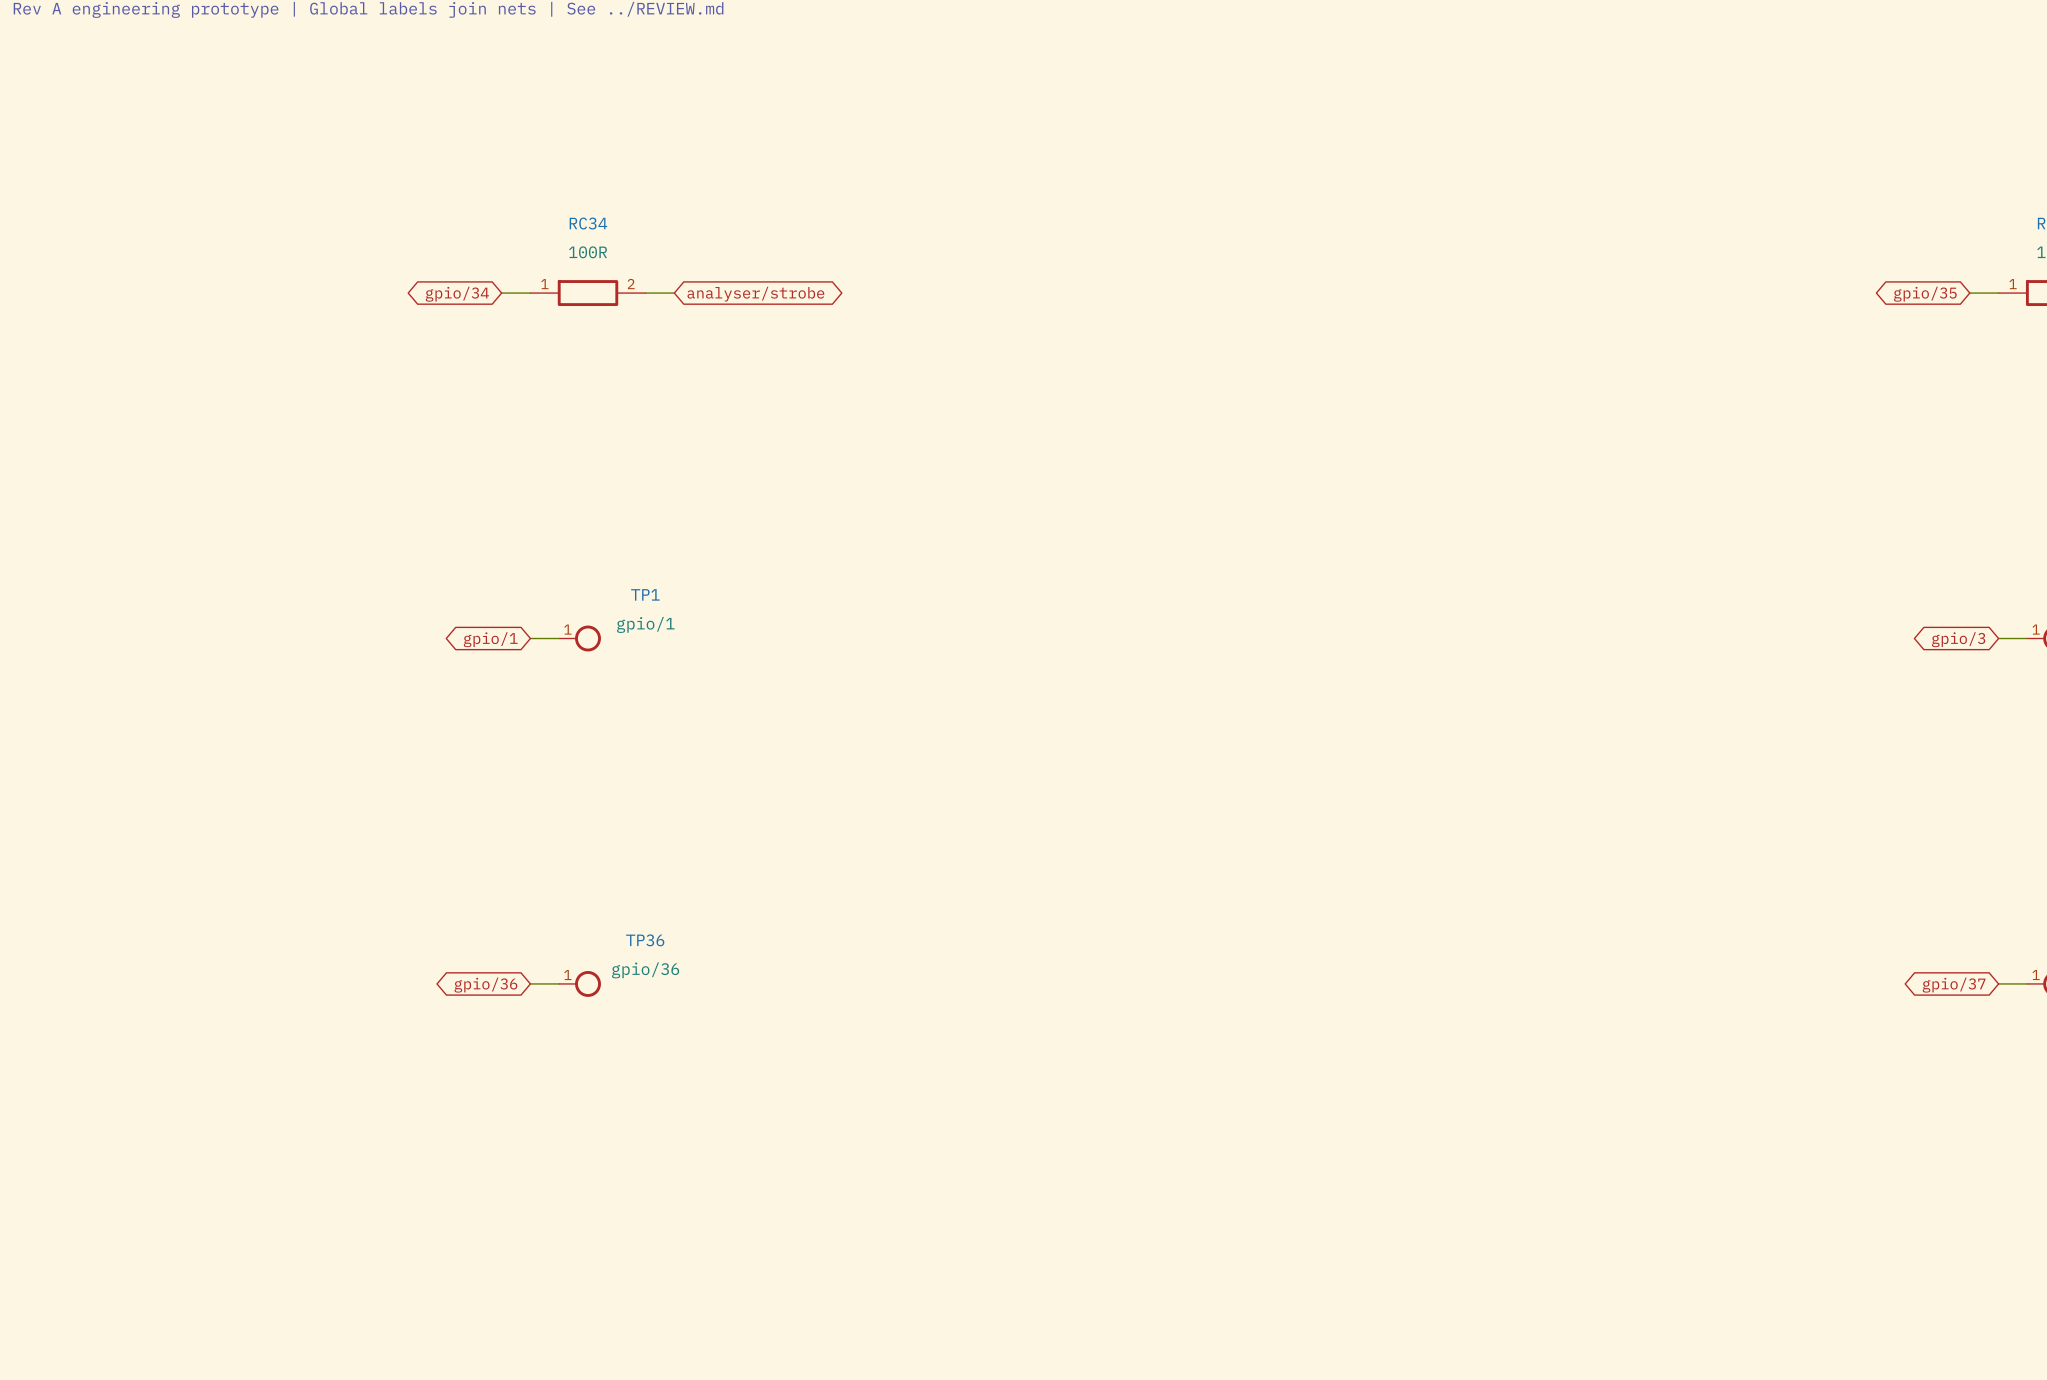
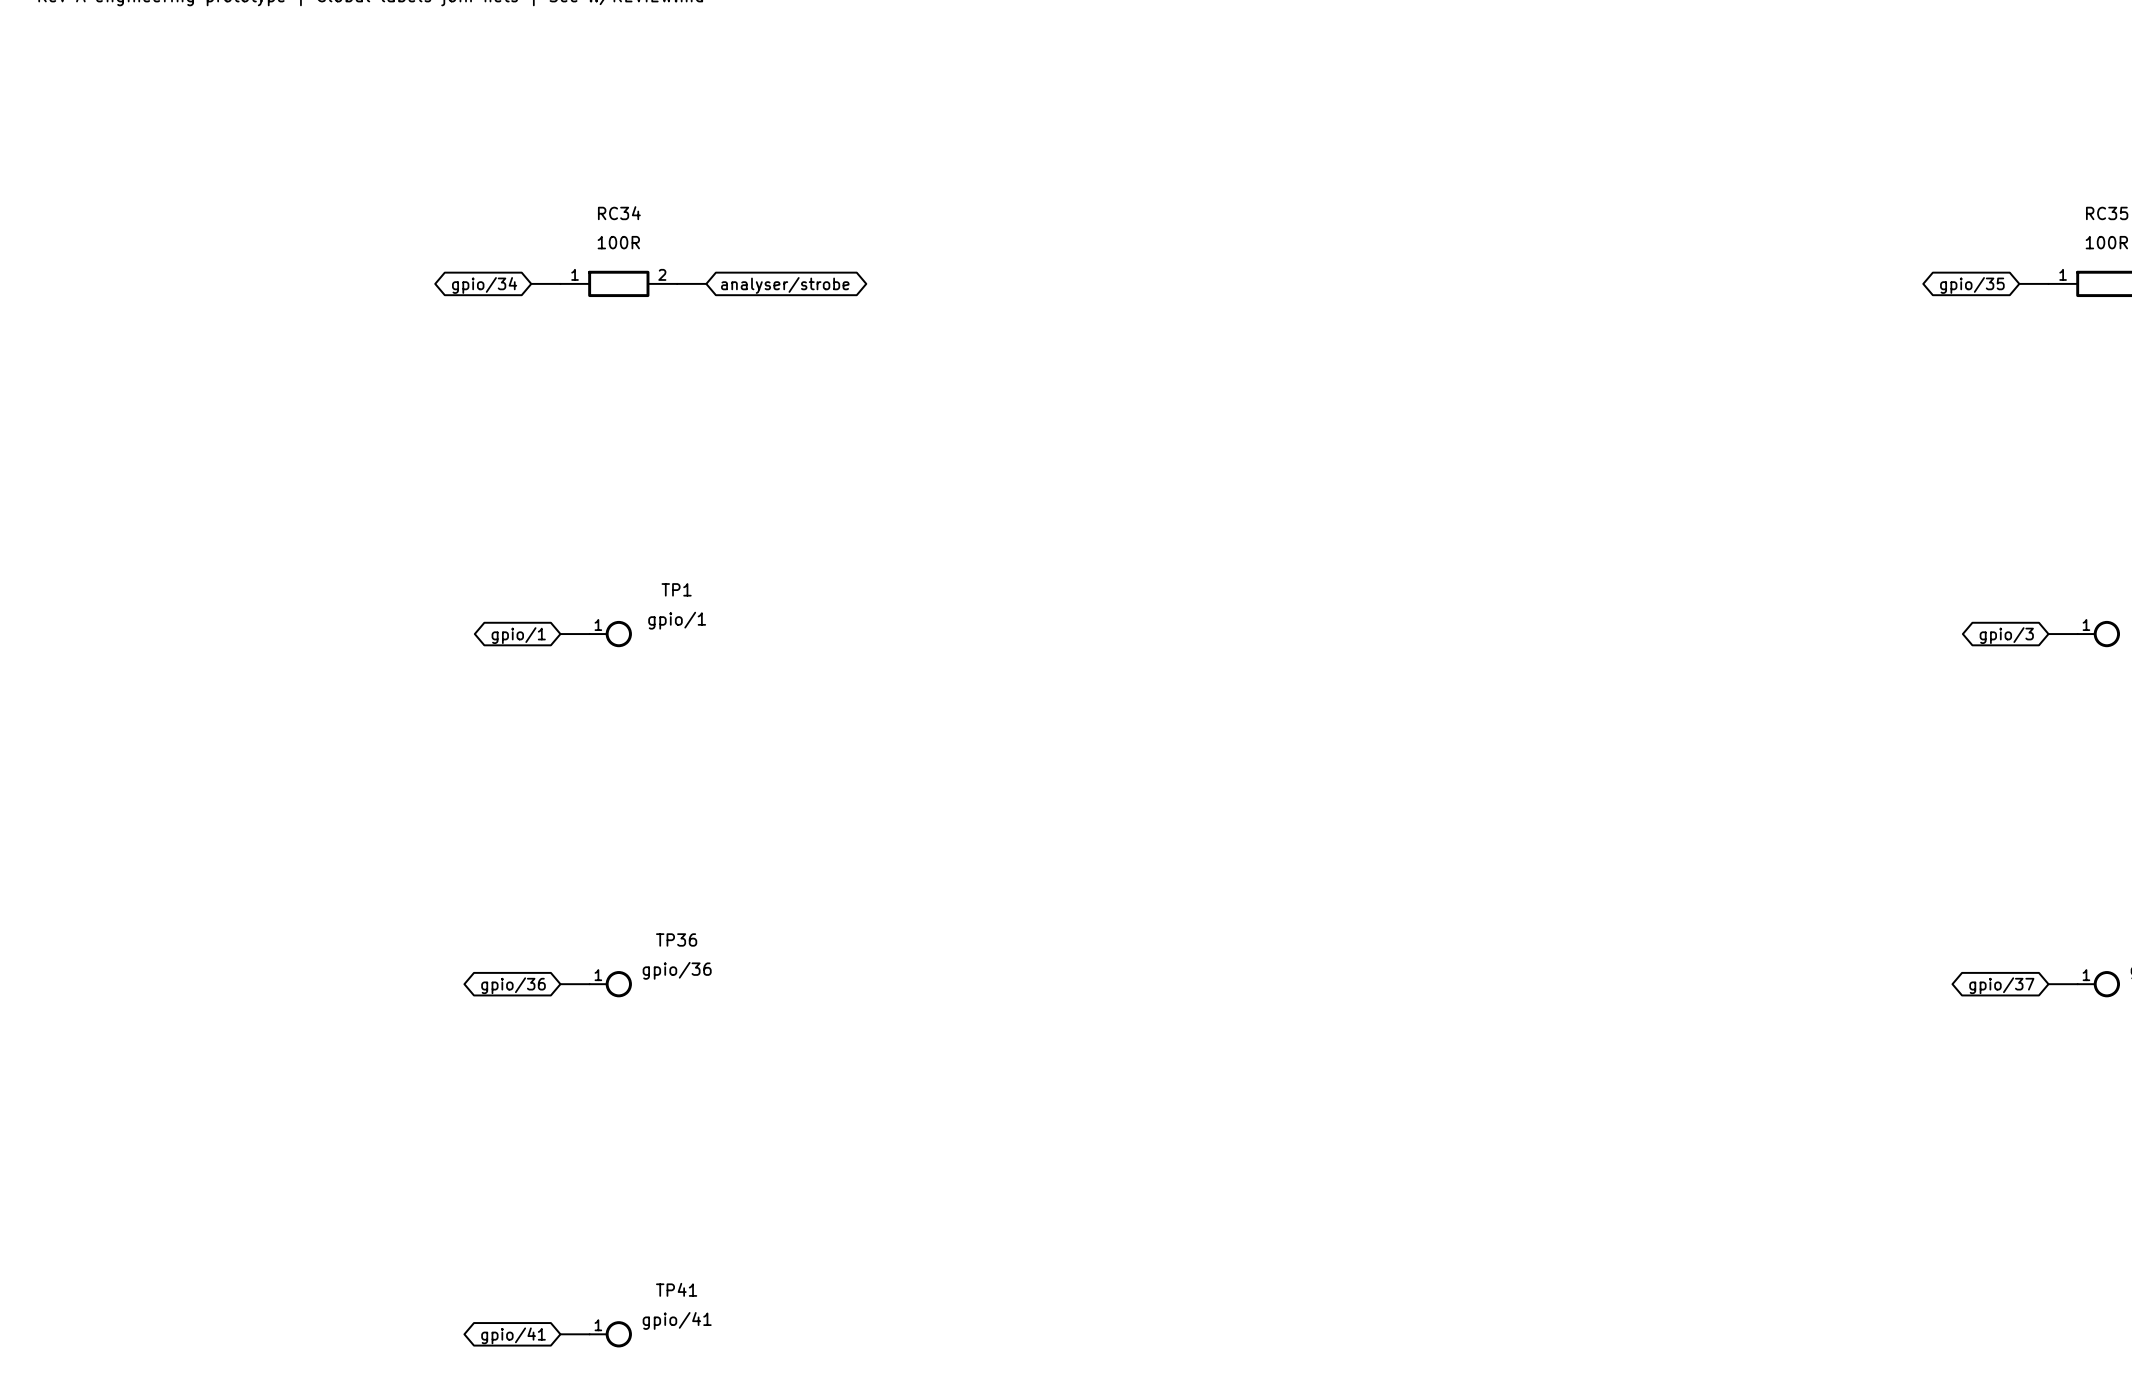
wire: none -> (560, 1334) (589, 1334)
TP41: none -> gpio/41 (610, 1334)
global label: none -> gpio/41 (513, 1335)

